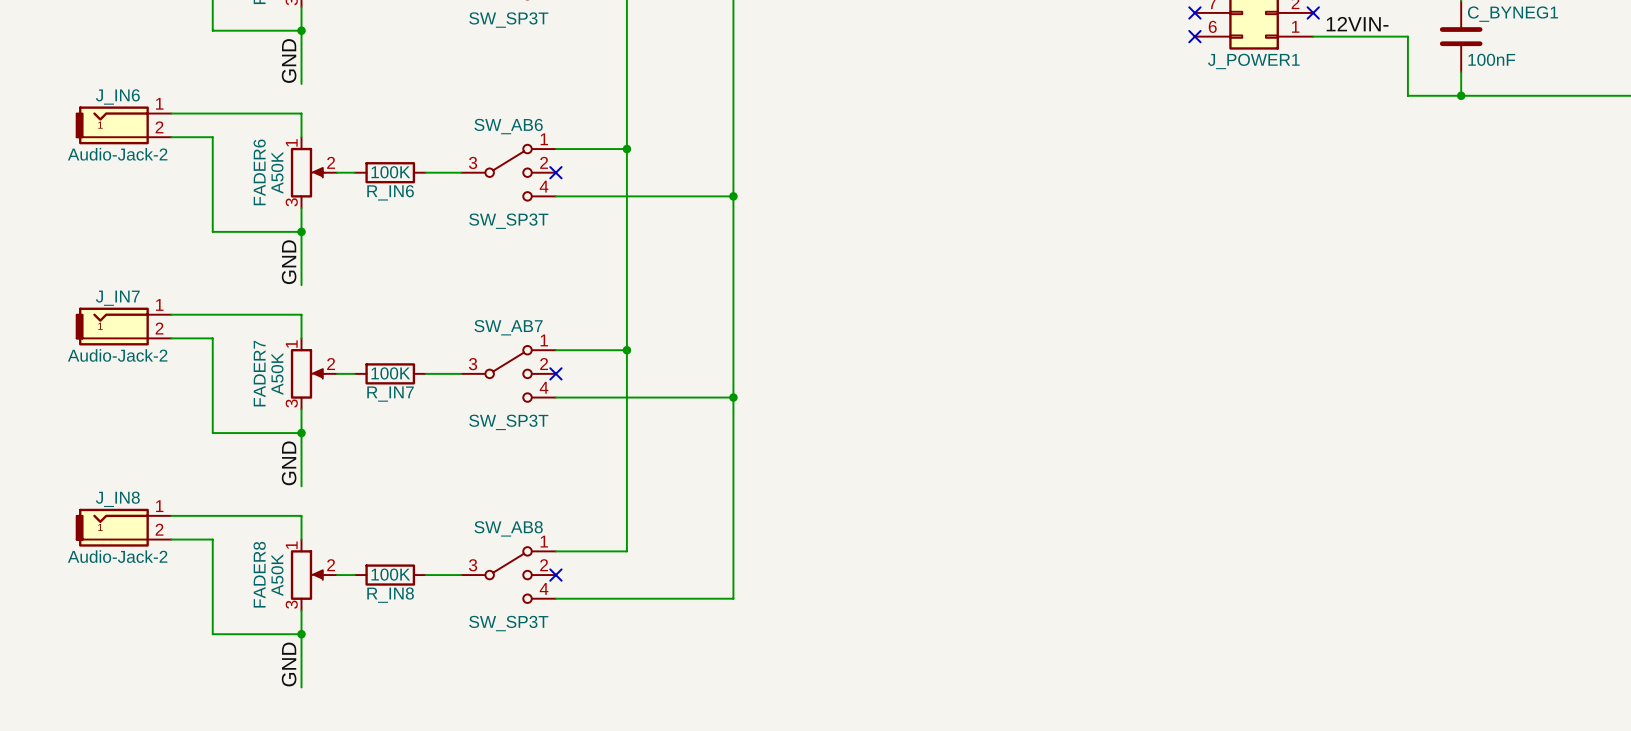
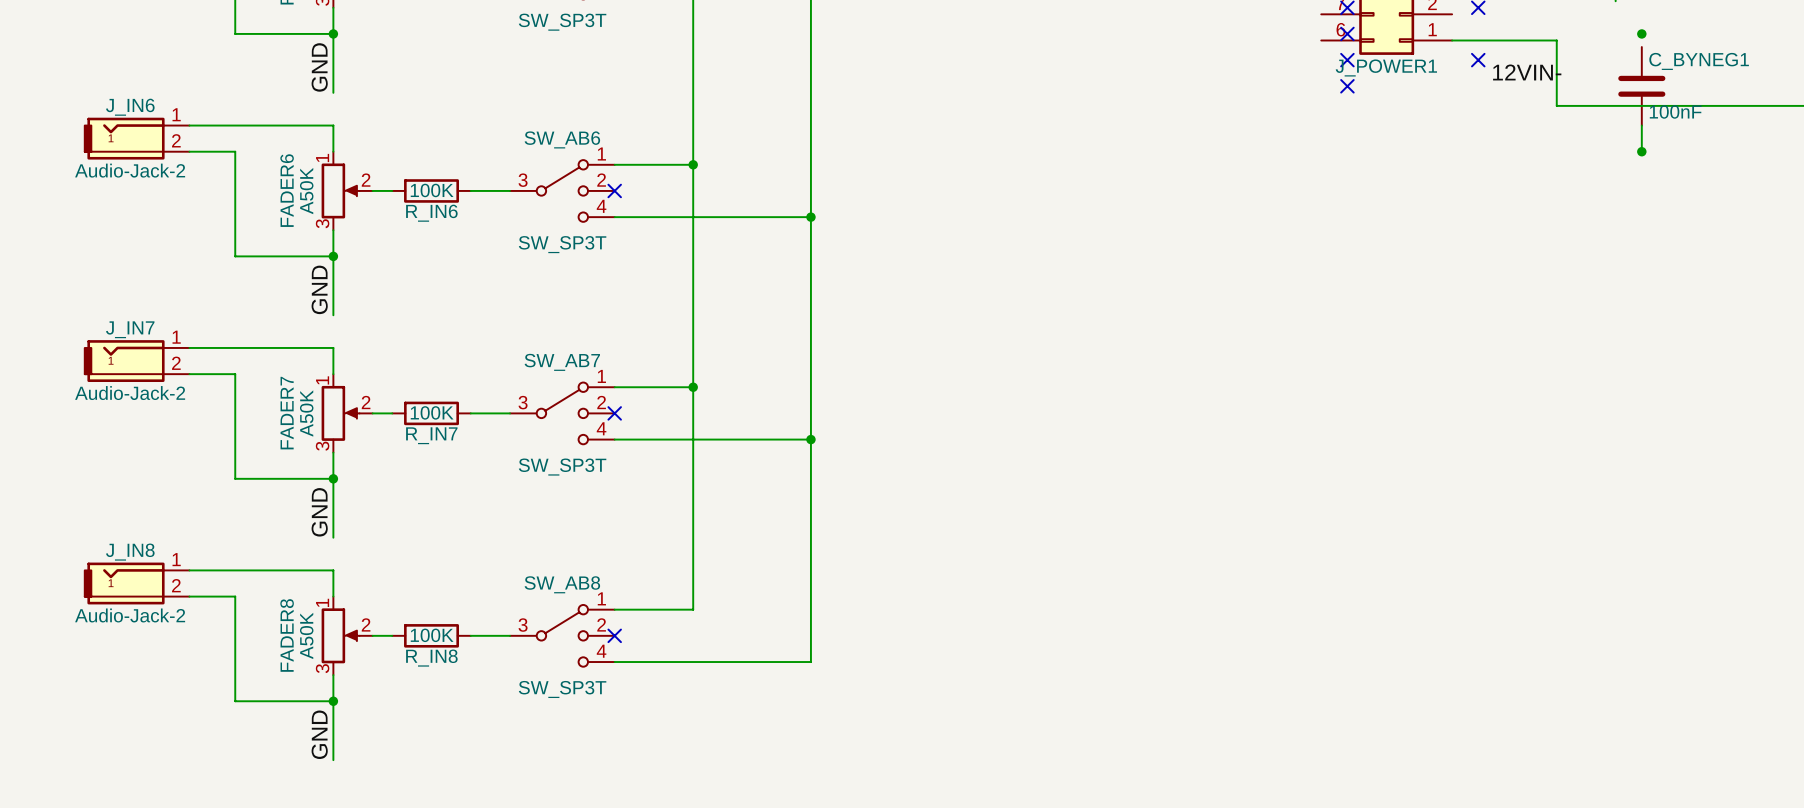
no-connect mark: none -> (1347, 7)
no-connect mark: none -> (1478, 7)
no-connect mark: (1194, 12) -> none
no-connect mark: (1313, 12) -> none
label position: 12VIN- (1357, 24) -> 12VIN- (1527, 72)
no-connect mark: none -> (1347, 33)
junction: none -> (1641, 33)
no-connect mark: (1194, 36) -> none
C_BYNEG1 position: (1461, 36) -> (1641, 86)
no-connect mark: none -> (1347, 60)
no-connect mark: none -> (1478, 60)
wire: (1461, 72) (1461, 95) -> (1641, 125) (1641, 151)
no-connect mark: none -> (1347, 86)
junction: (1461, 95) -> none
junction: none -> (1641, 151)

